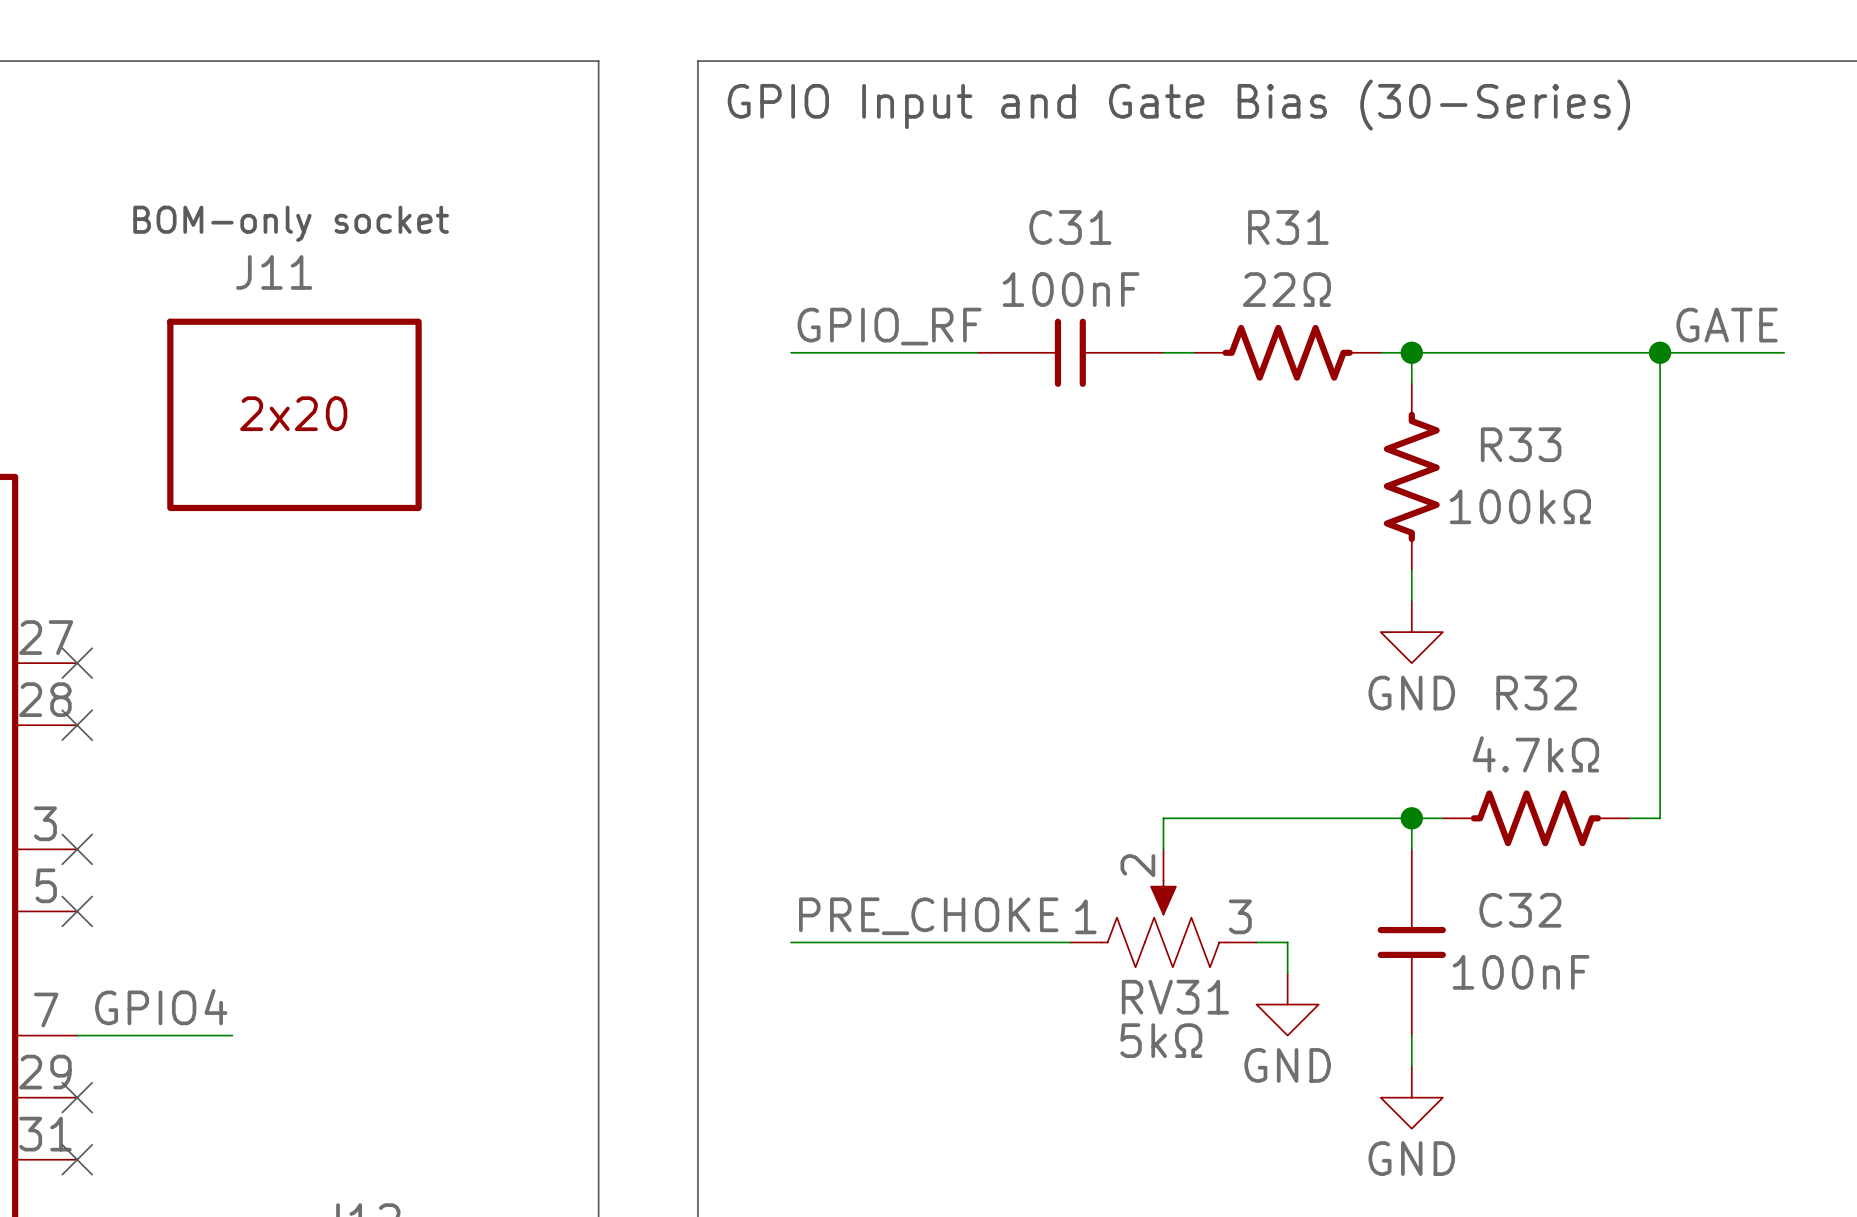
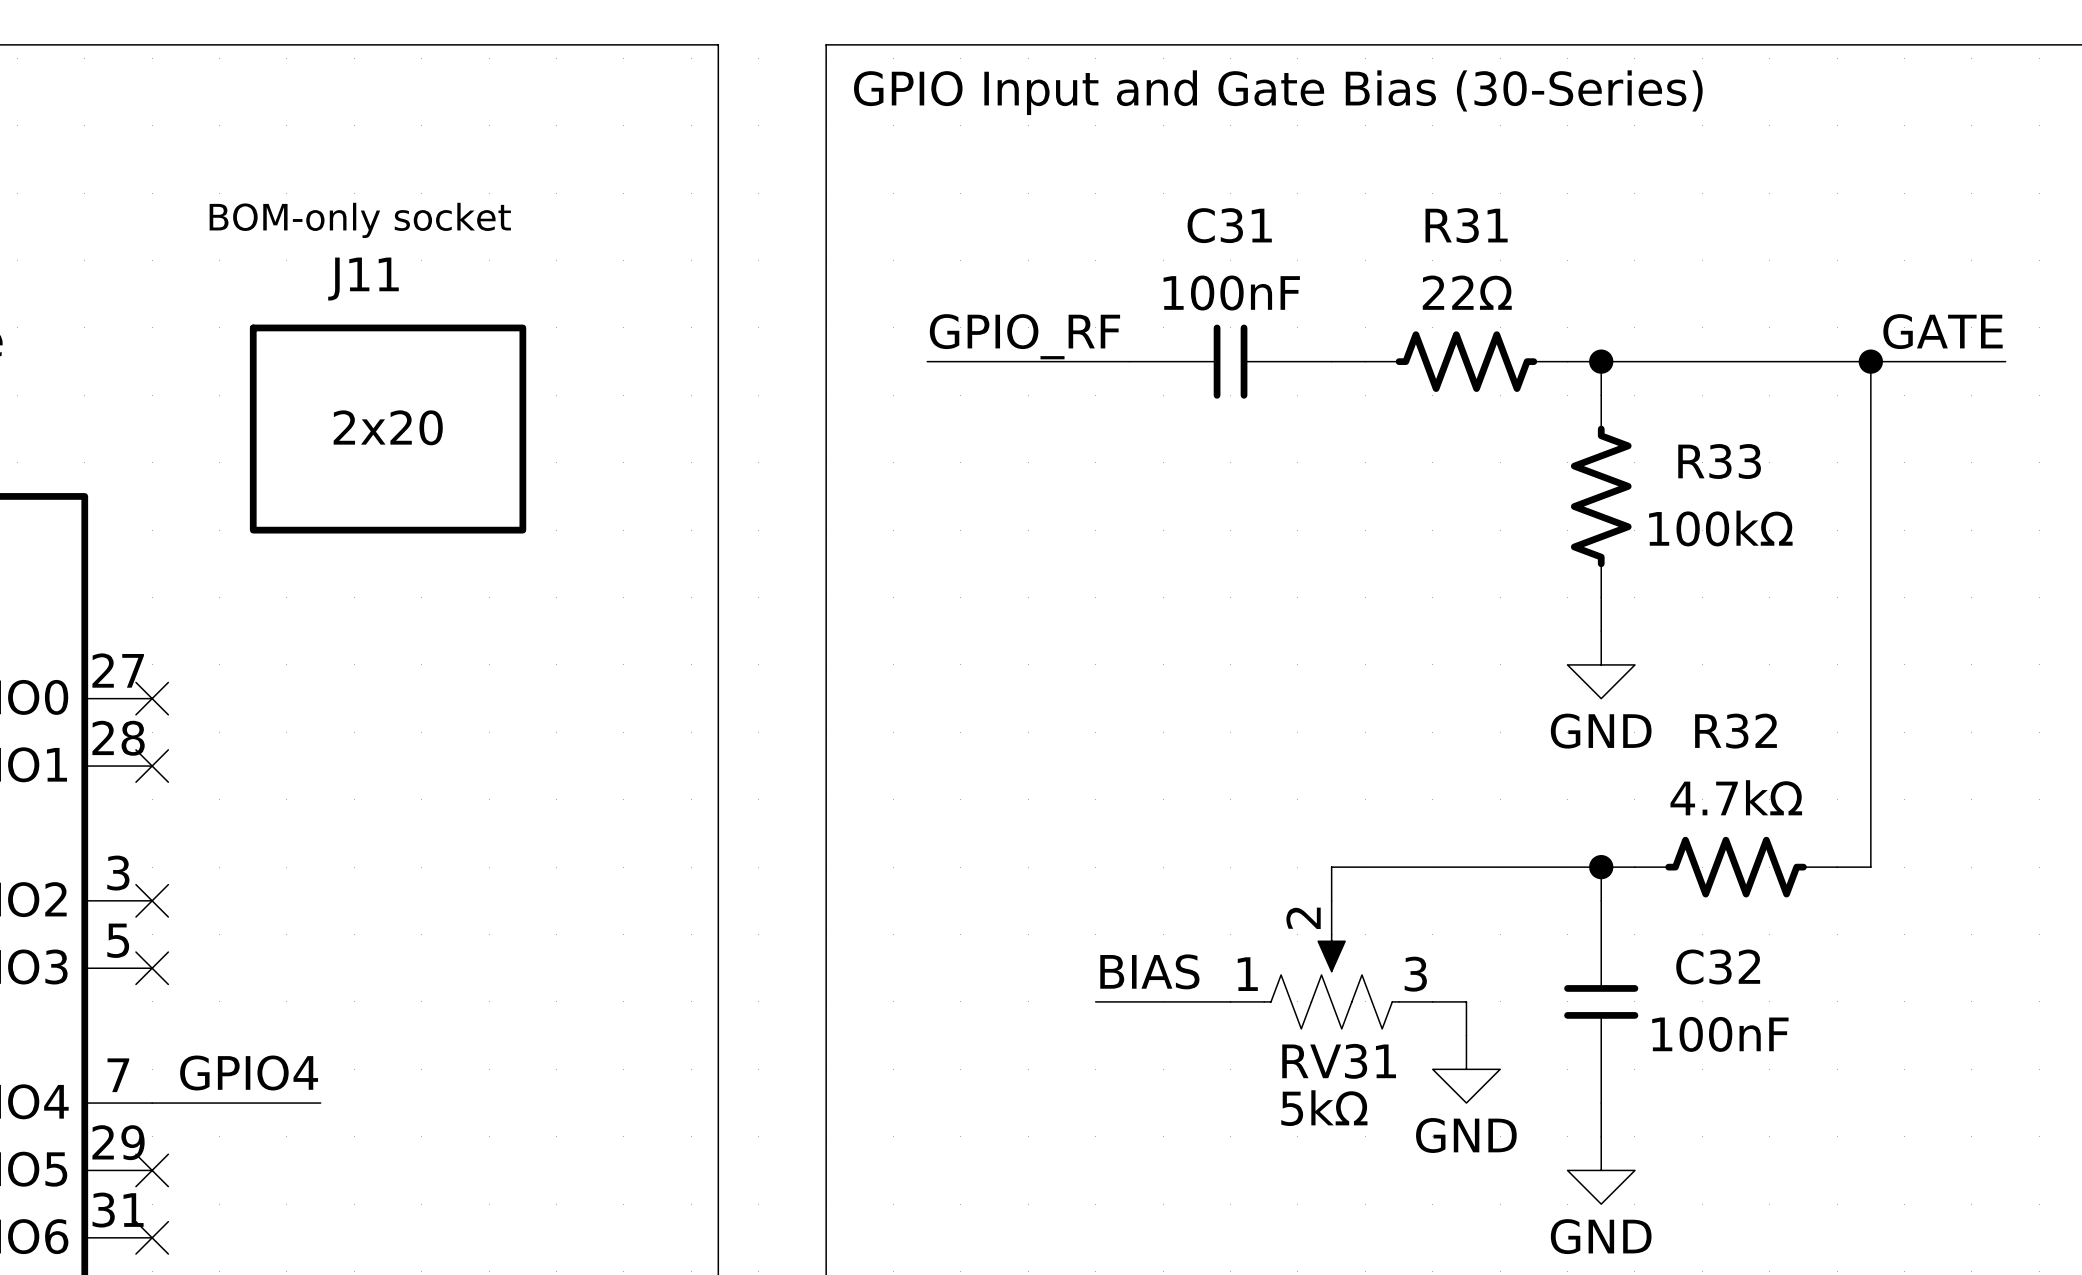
label: none -> BIAS (1149, 971)
label: PRE_CHOKE (928, 916) -> none
wire: (791, 942) (946, 942) -> none

